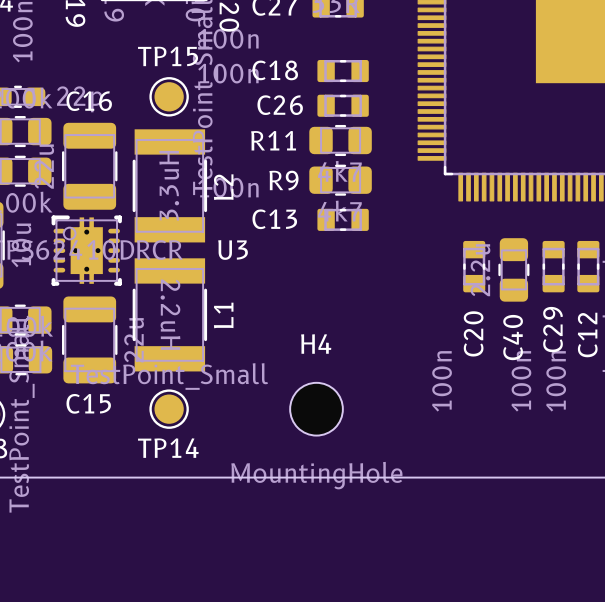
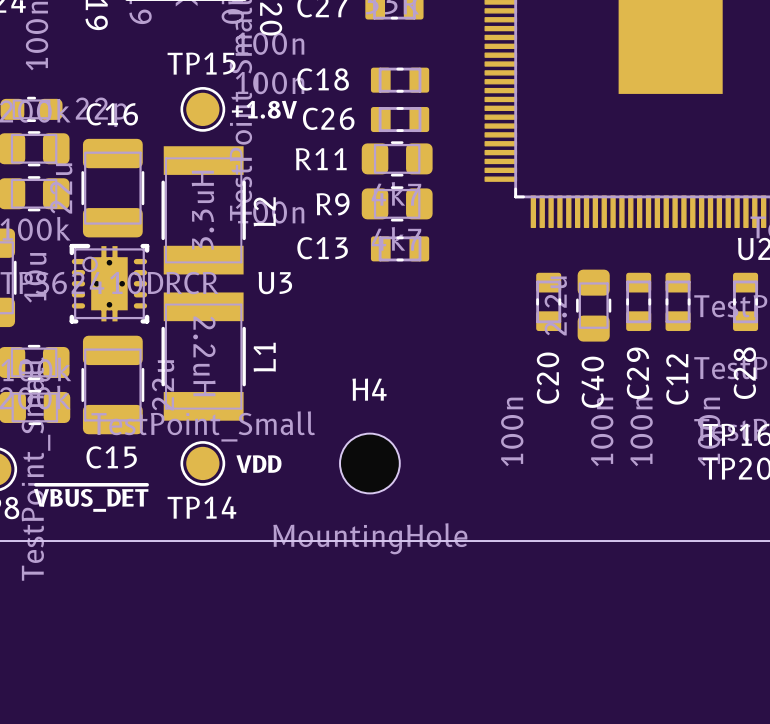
text: none -> +1.8V (264, 109)
text: none -> VDD (258, 464)
text: none -> ~{VBUS_DET} (91, 498)

